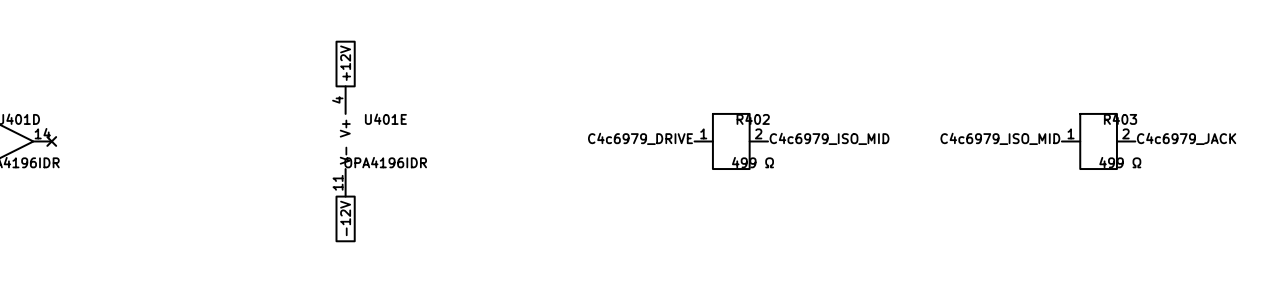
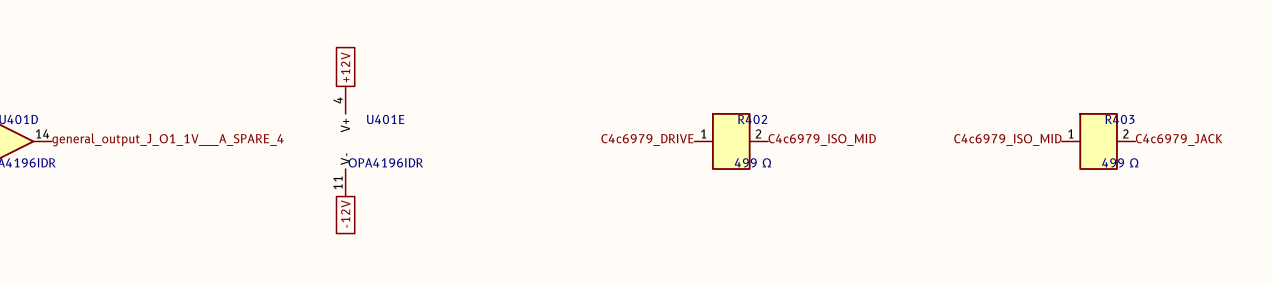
label: none -> general_output_J_O1_1V___A_SPARE_4 (167, 139)
no-connect mark: (51, 141) -> none

